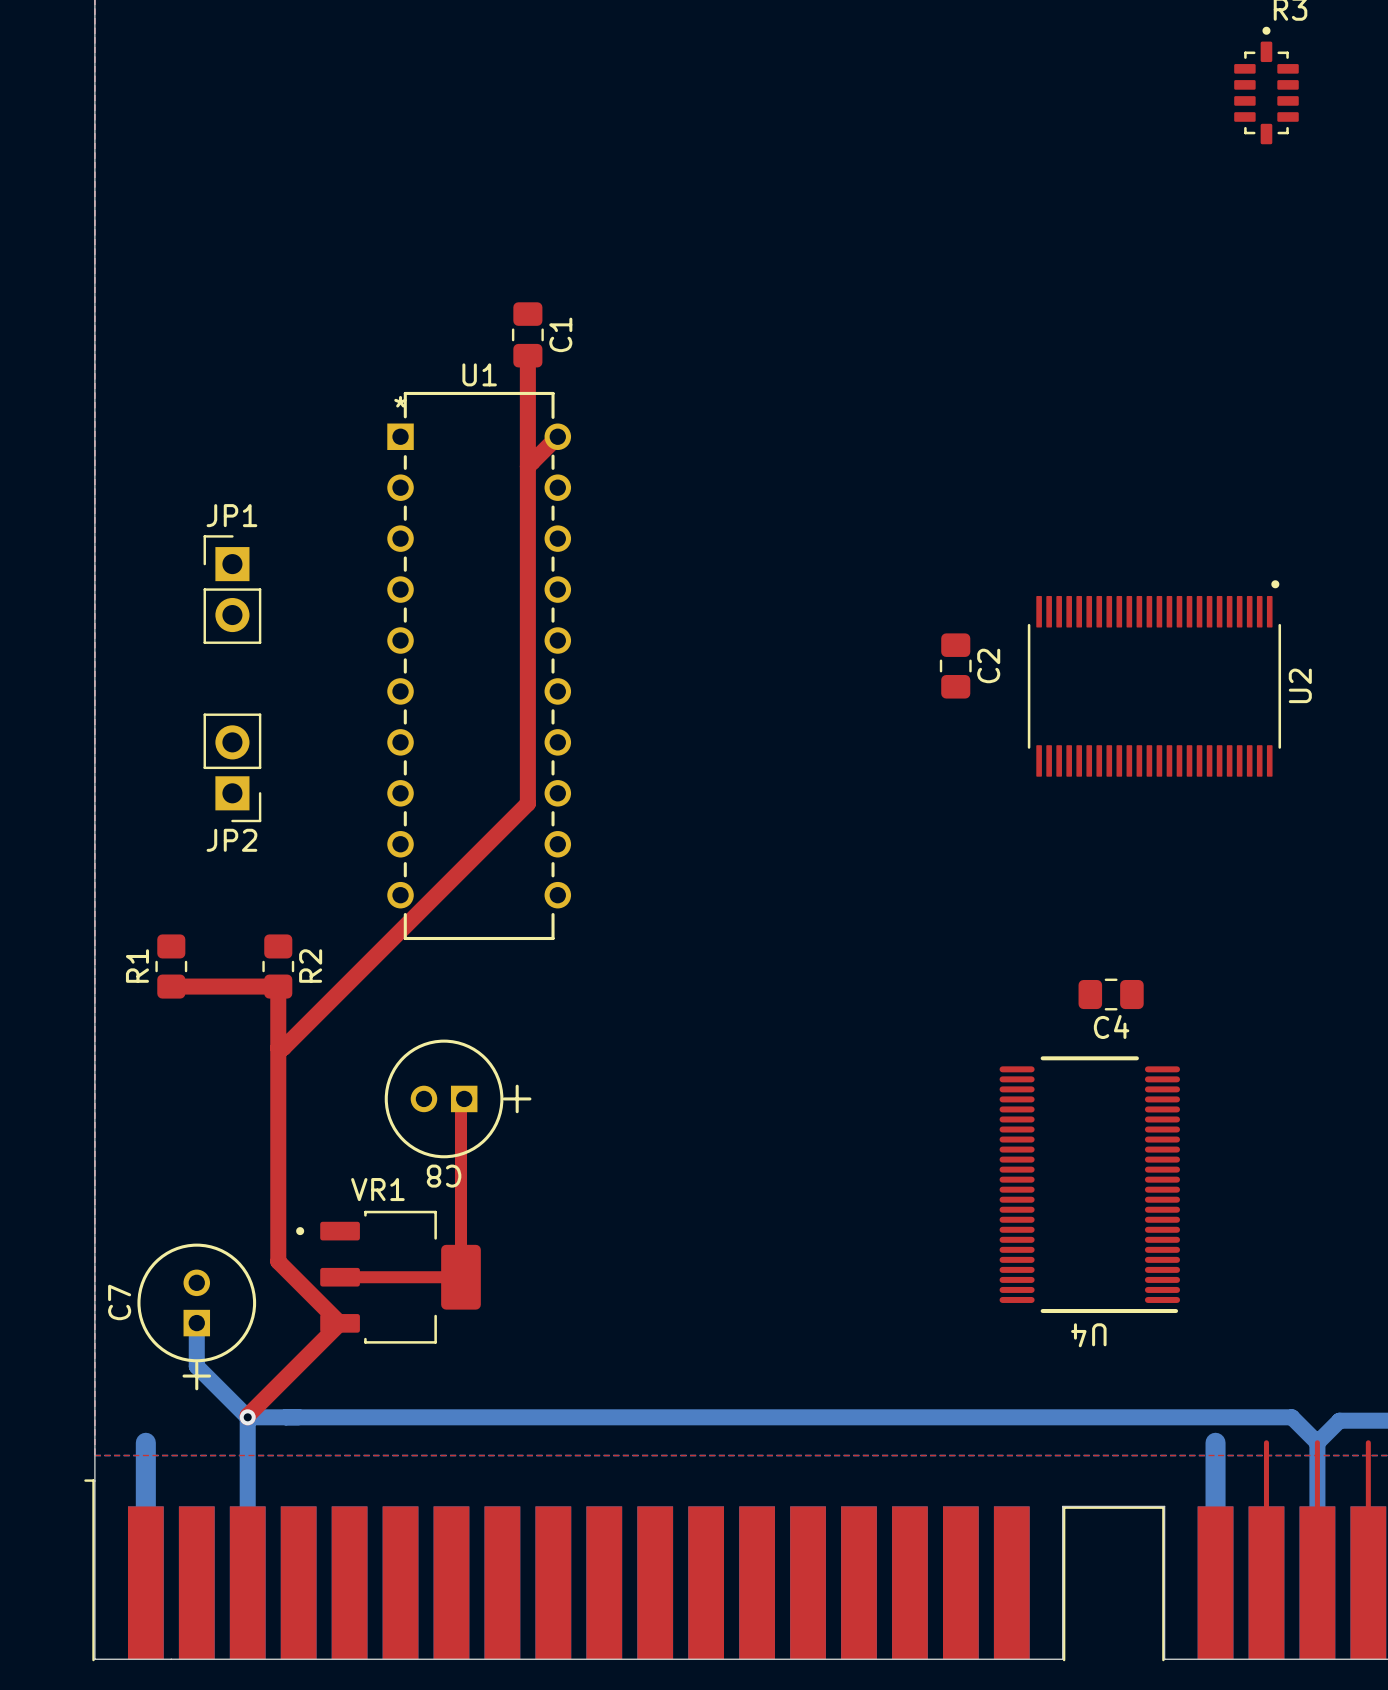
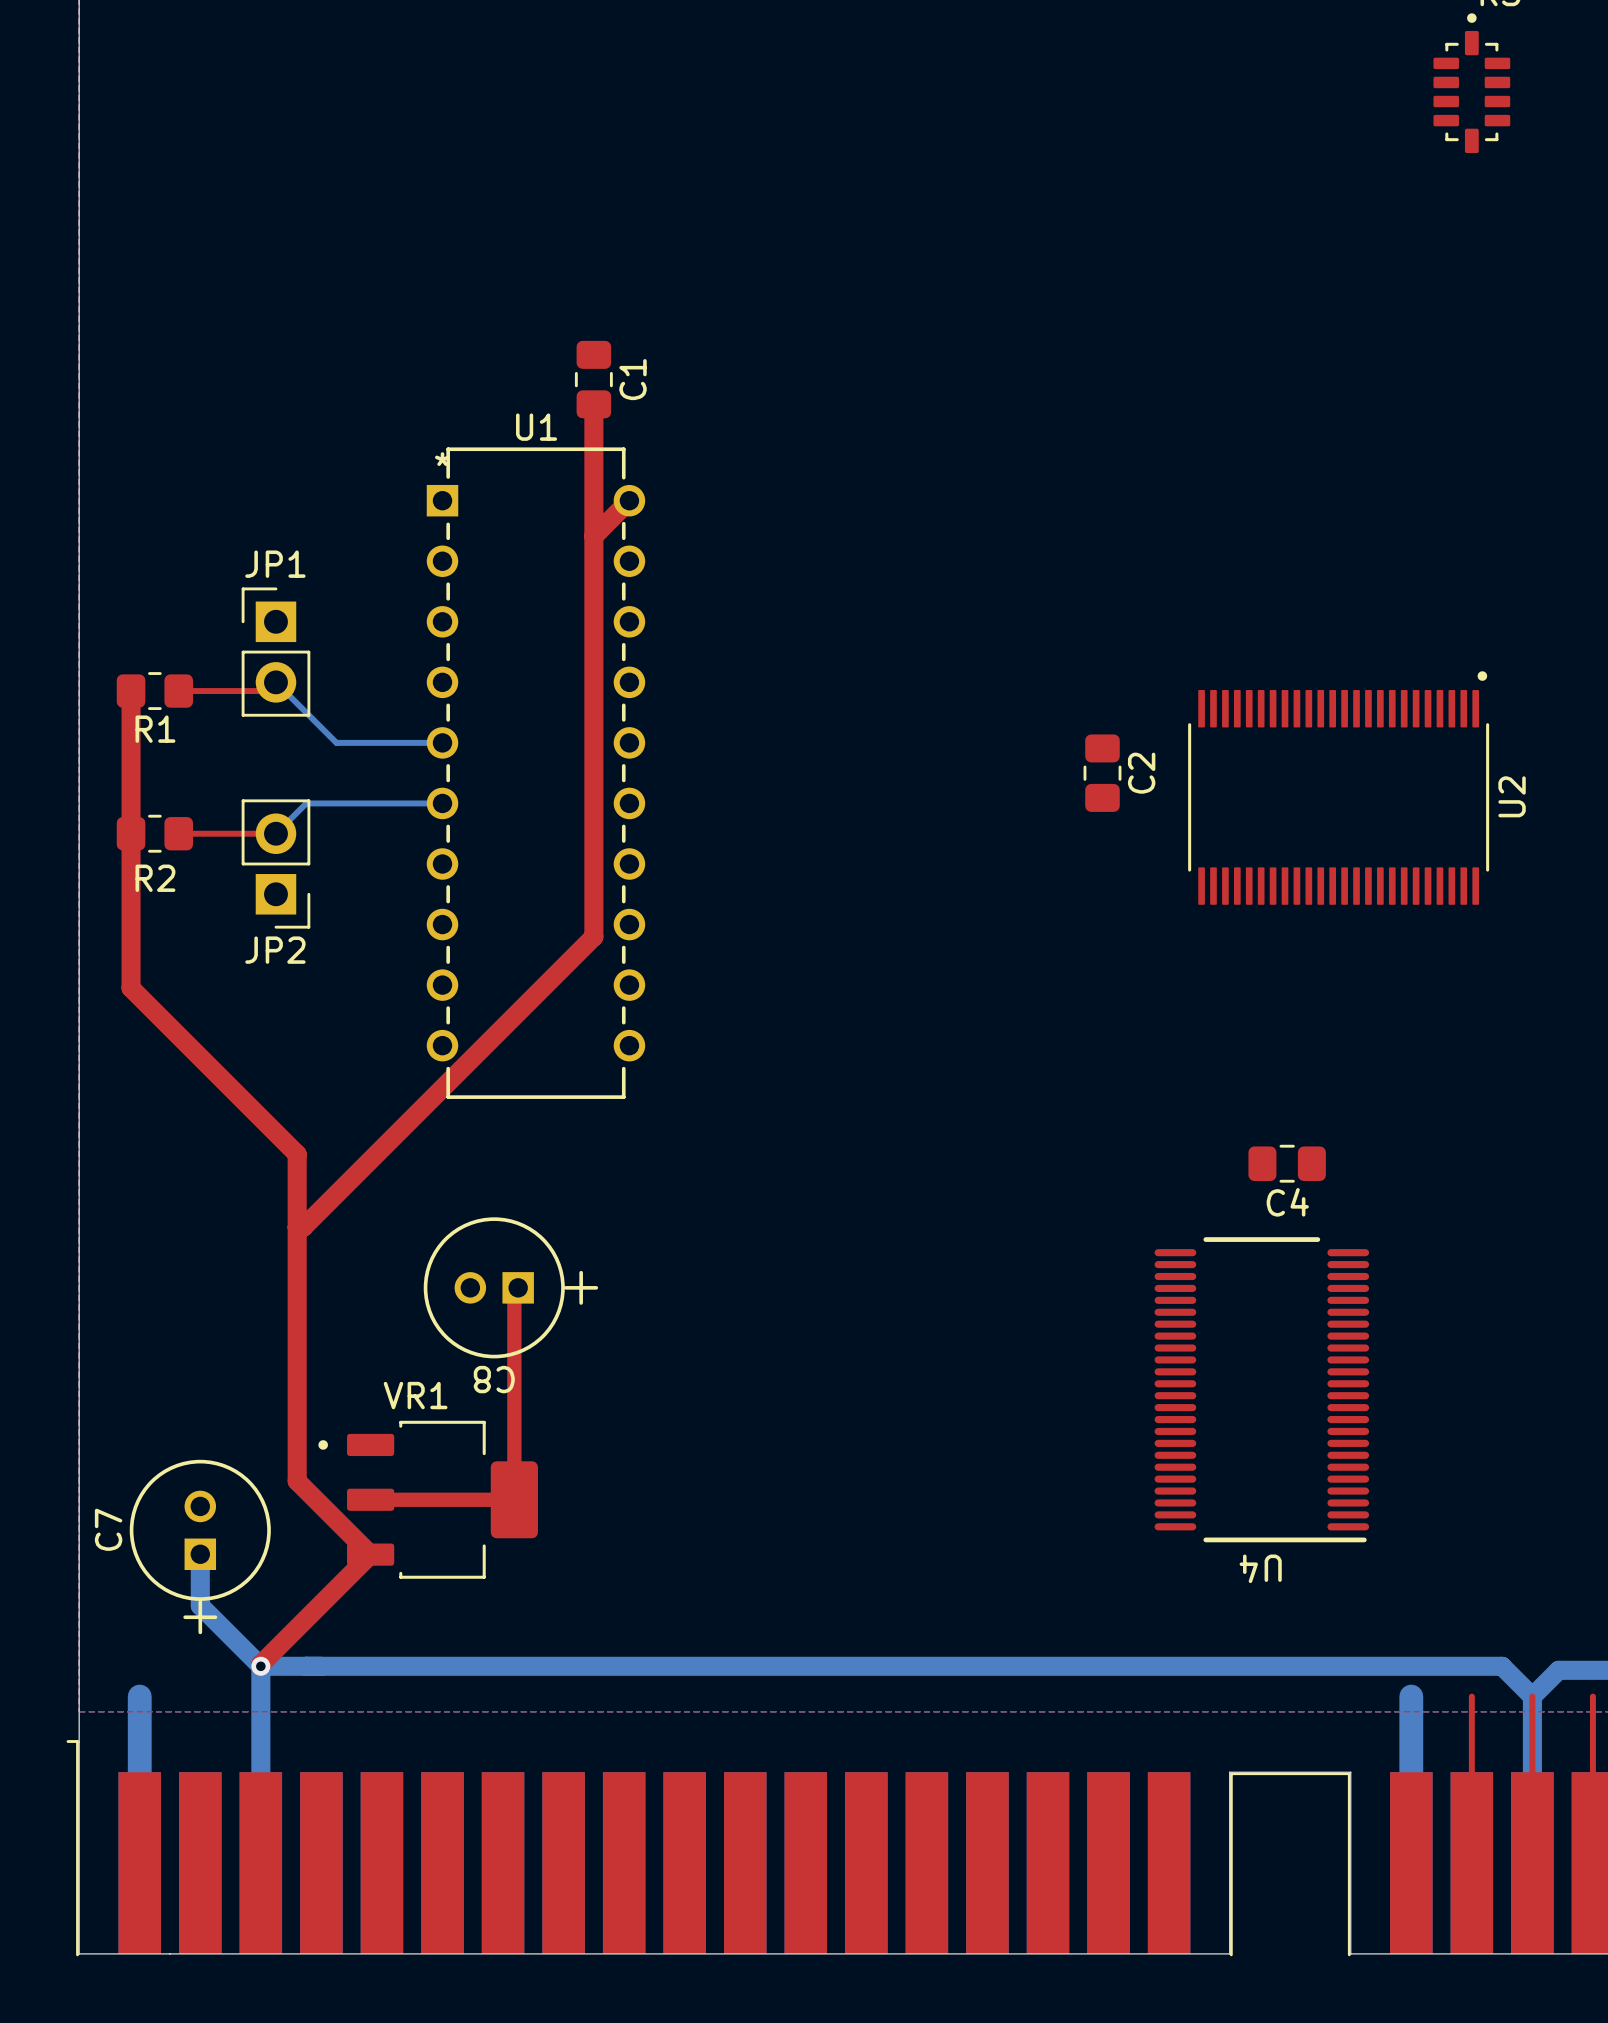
JP1 position: (232, 589) -> (275, 652)
top track: none -> (275, 682) (267, 691) (178, 691)
bottom track: none -> (275, 682) (336, 742) (442, 742)
bottom track: none -> (442, 803) (306, 803) (275, 833)
top track: none -> (178, 833) (275, 833)
JP2 position: (232, 767) -> (275, 864)
R1 name position: R1 (137, 966) -> R1 (155, 729)
R1 rotation: 0° (171, 966) -> 90° clockwise (154, 691)
R1 position: (171, 966) -> (154, 691)
R2 rotation: 0° (278, 966) -> 90° clockwise (154, 833)
R2 position: (278, 966) -> (154, 833)
top track: (171, 986) (278, 986) -> (131, 691) (131, 988) (297, 1154)

